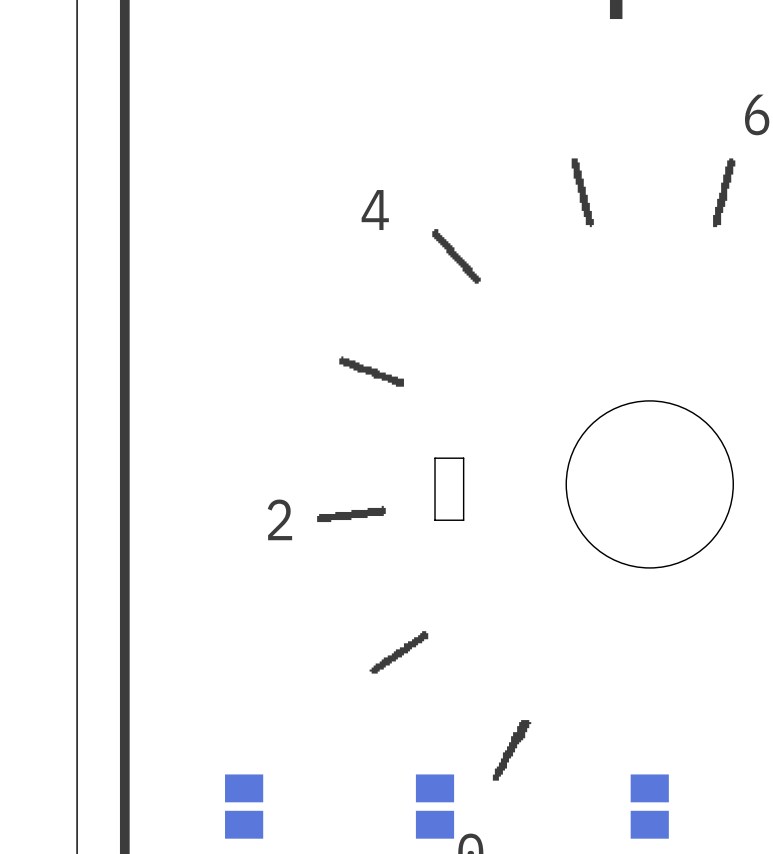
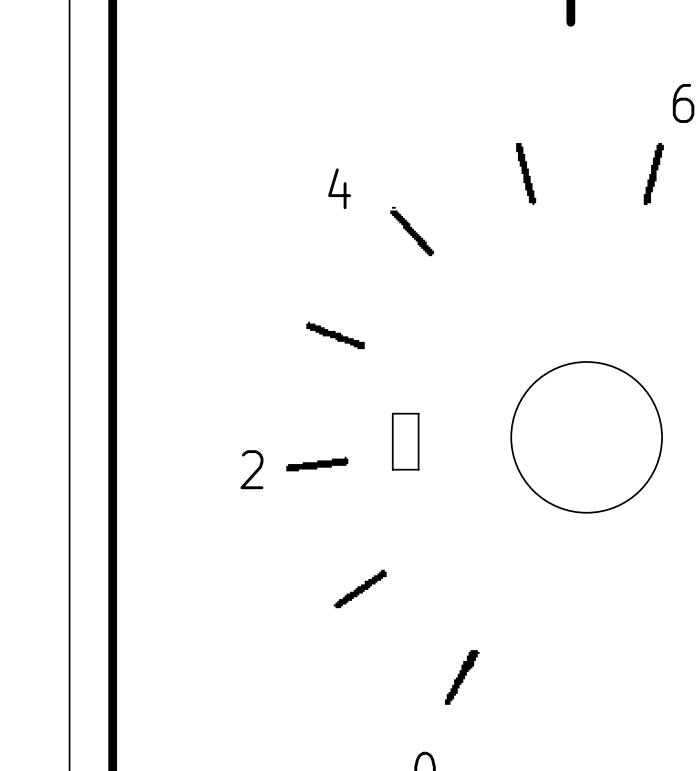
drawing: [432, 231, 439, 234] -> none
part: (244, 806) -> none
part: (435, 806) -> none
part: (649, 806) -> none

